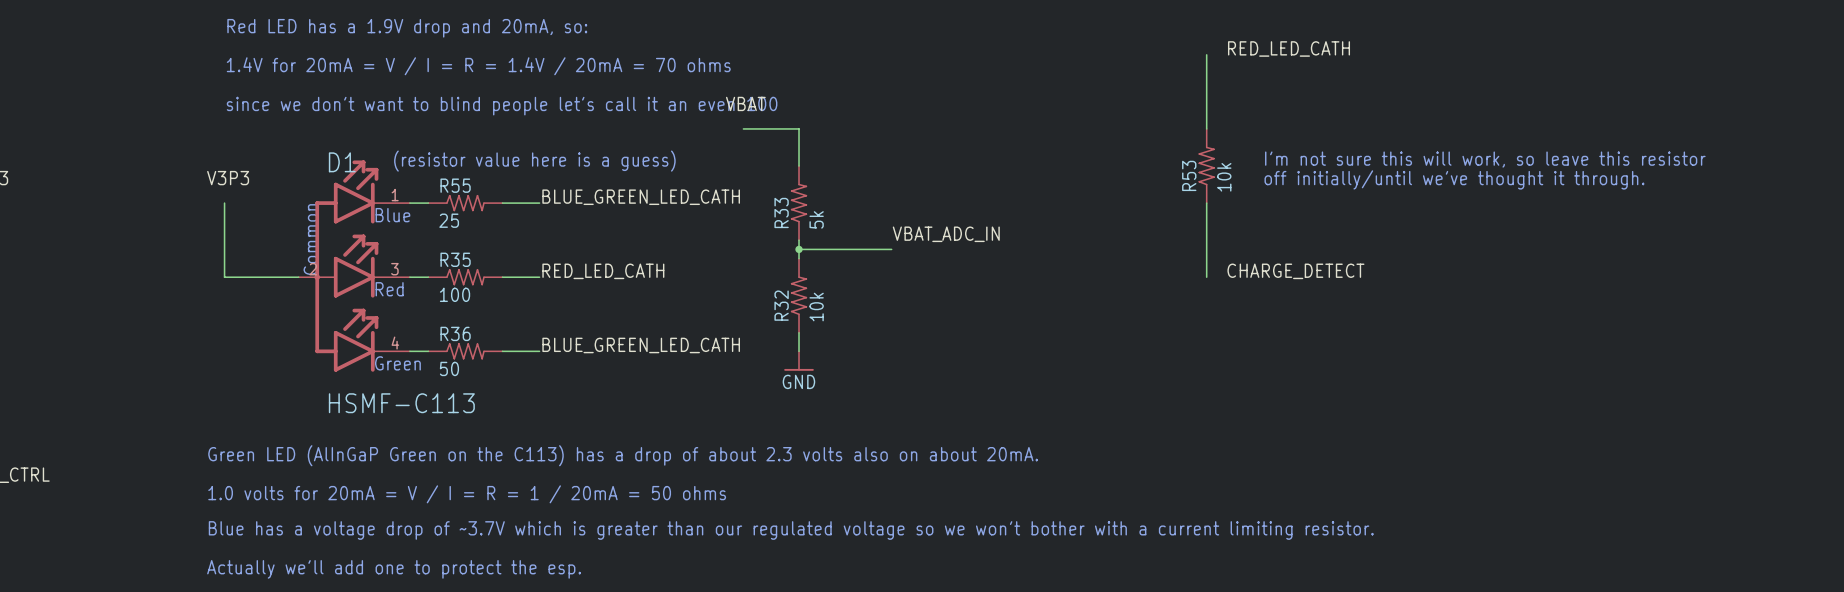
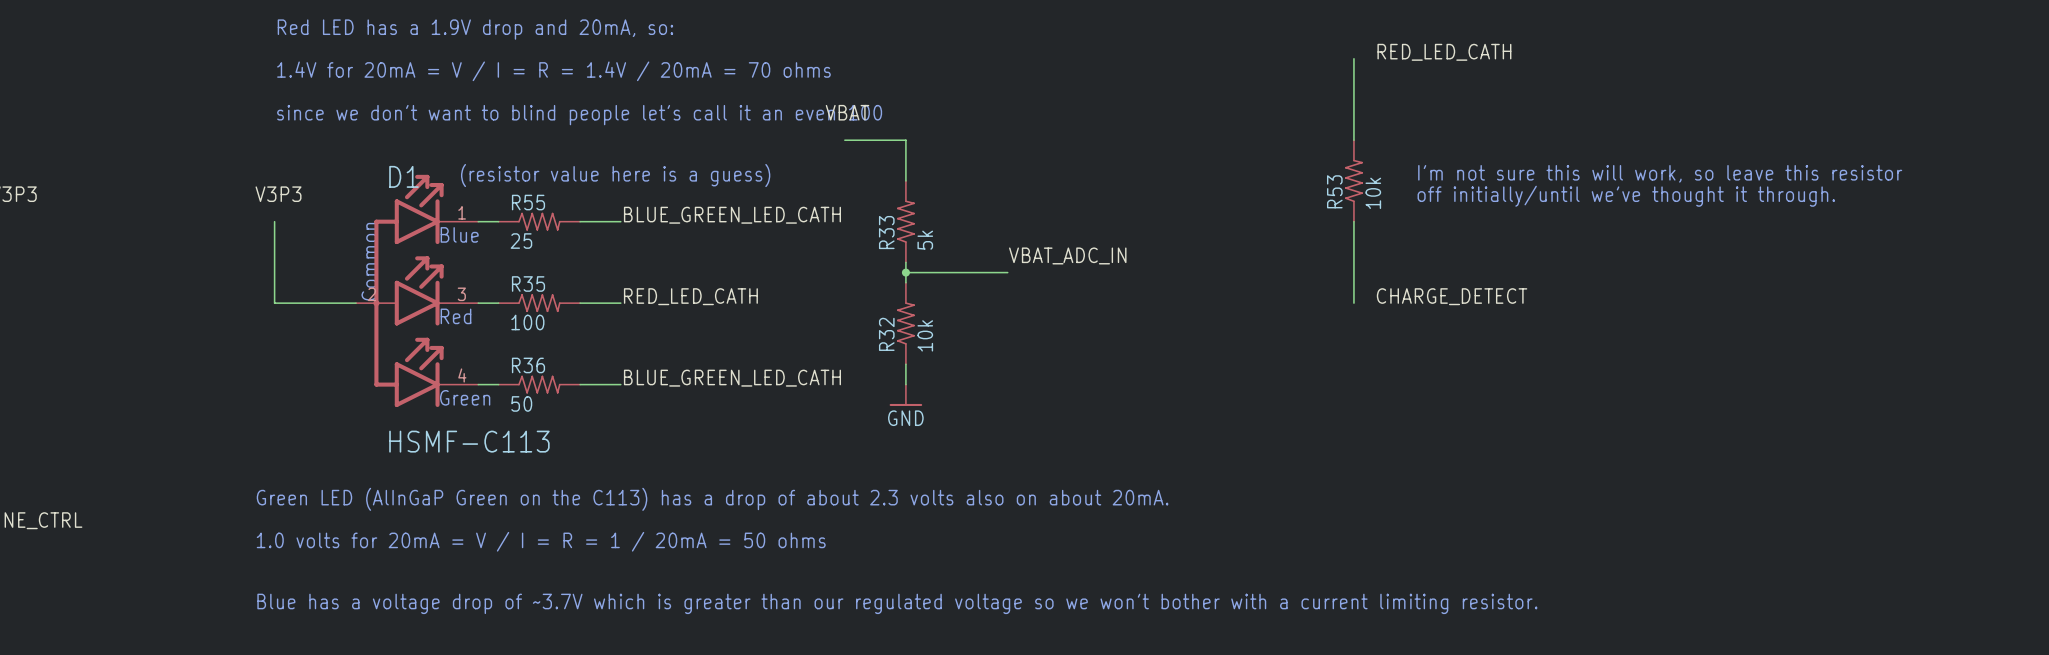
text position: Blue has a voltage drop of ~3.7V which is greater than our regulated voltage so we won't bother with a current limiting resistor. (791, 530) -> Blue has a voltage drop of ~3.7V which is greater than our regulated voltage so we won't bother with a current limiting resistor. (897, 603)
text: Actually we'll add one to protect the esp. (394, 569) -> none

